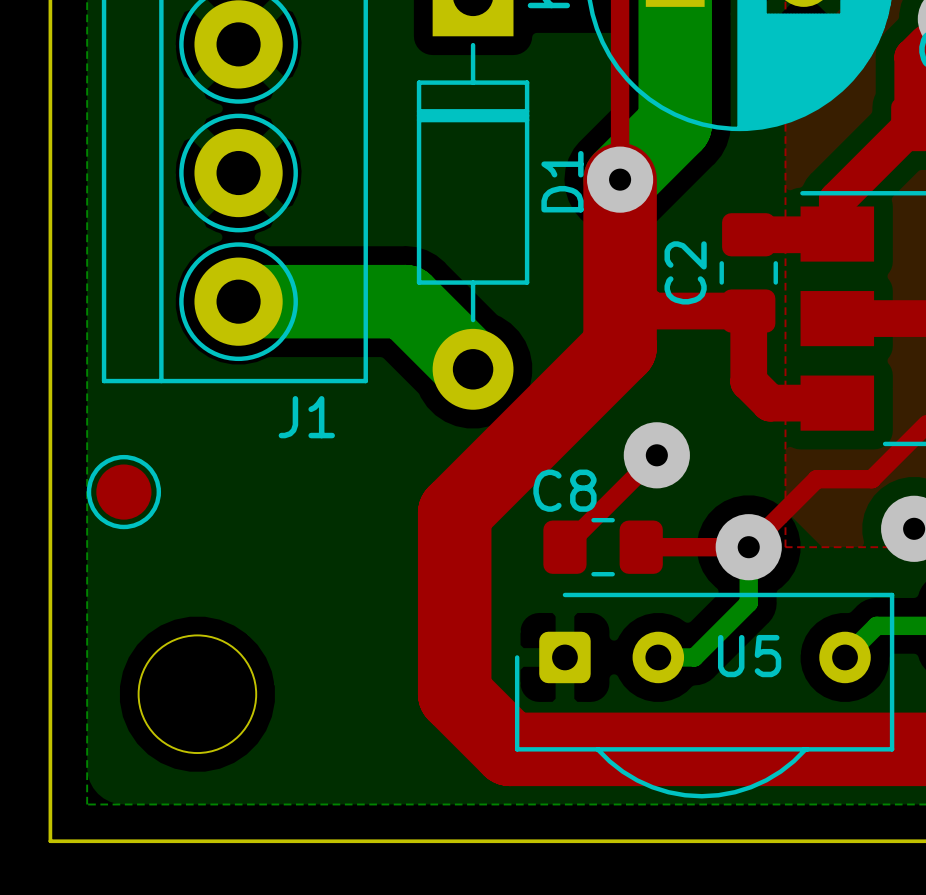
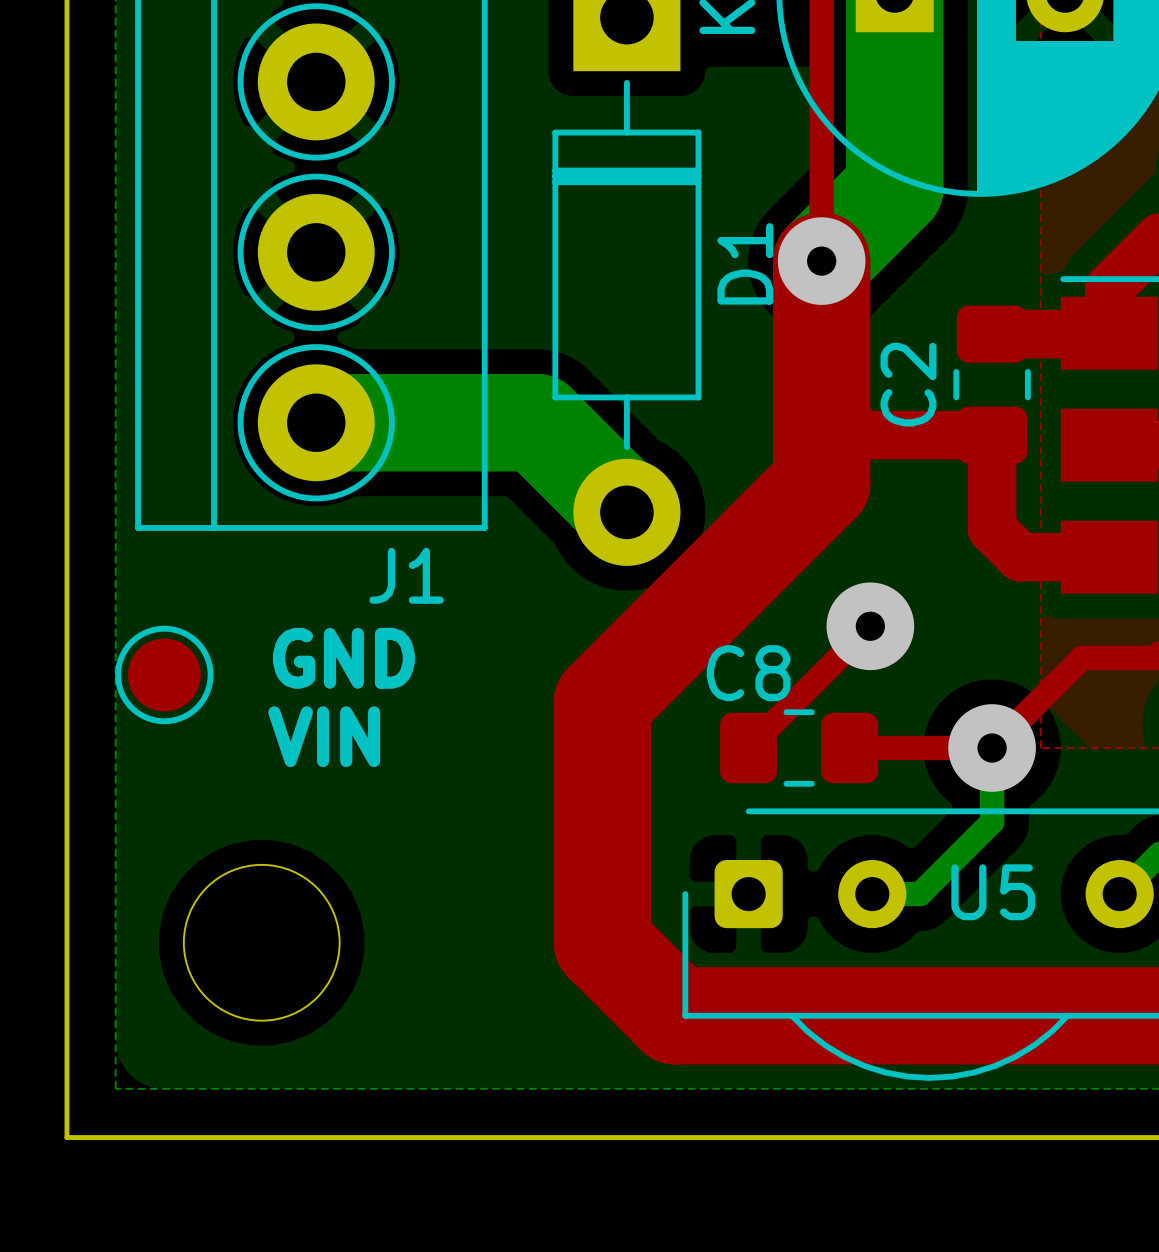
text: none -> GND (343, 658)
text: none -> VIN (324, 736)

